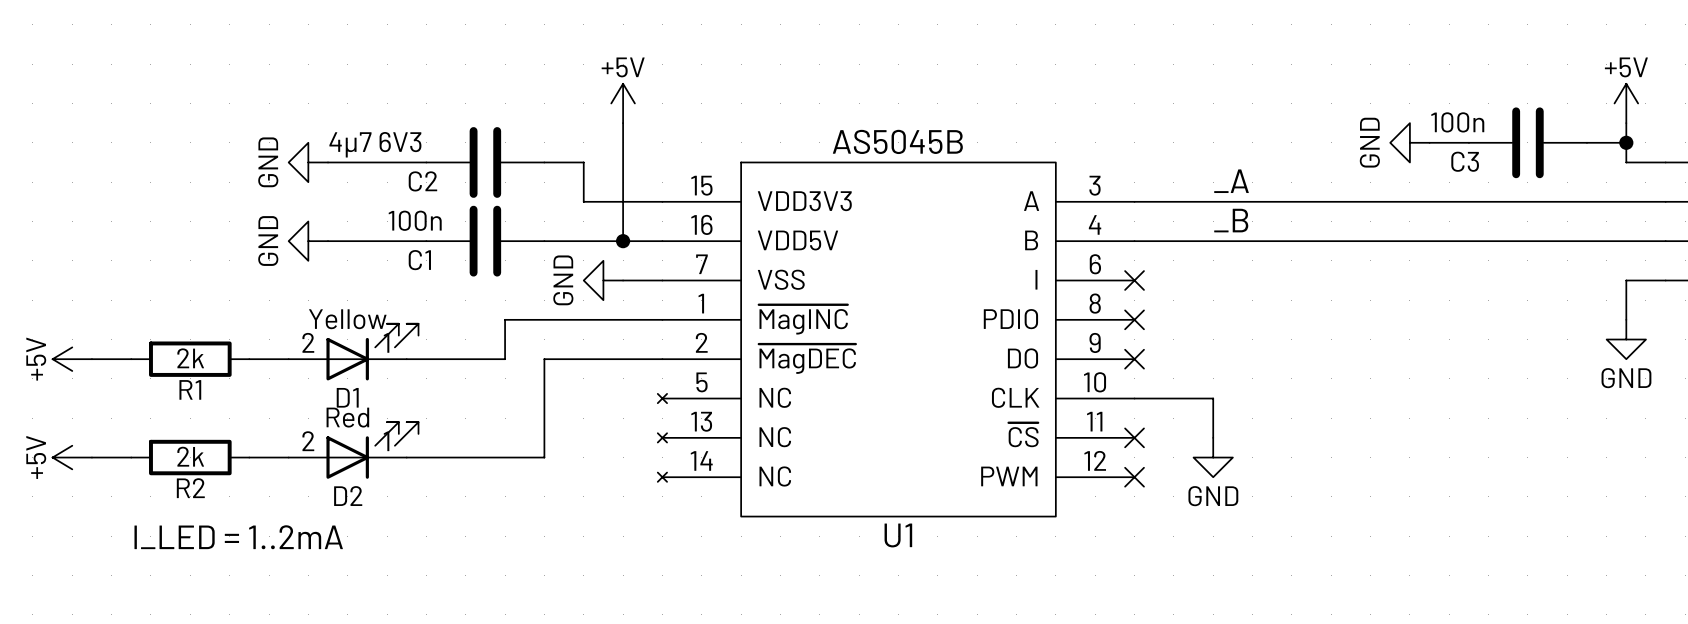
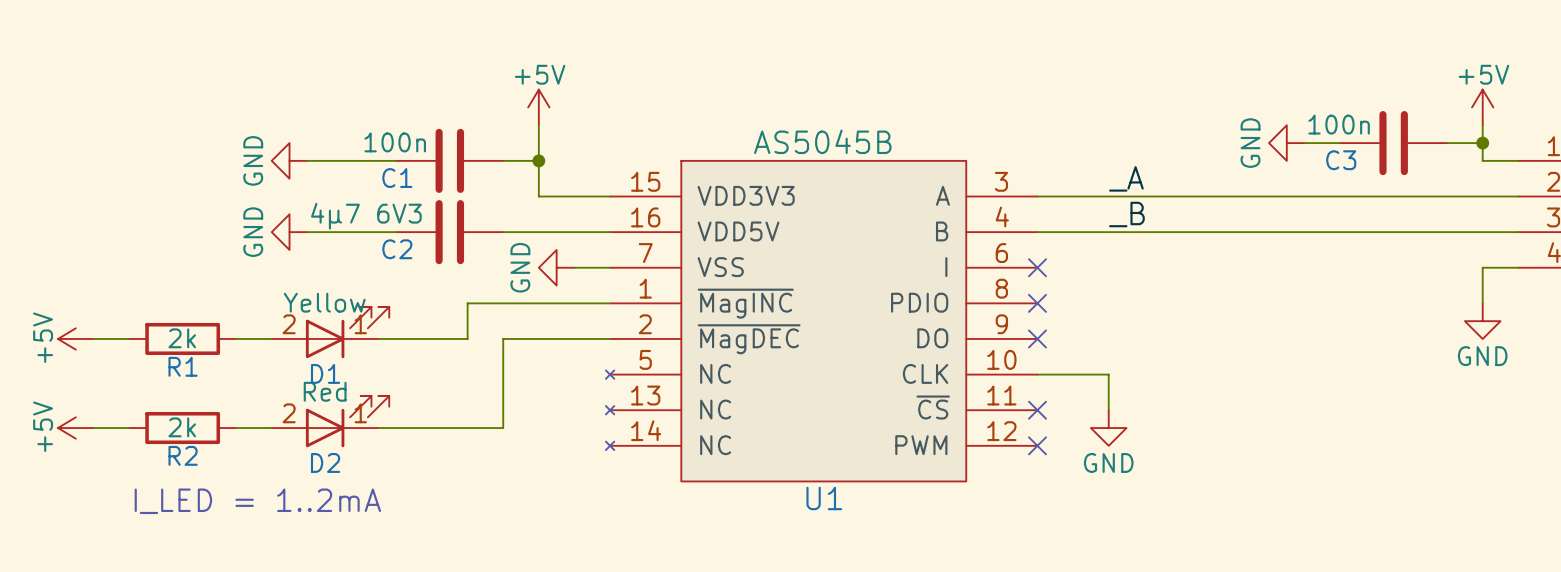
power symbol position: +5V (623, 103) -> +5V (538, 107)
wire: none -> (538, 125) (538, 160)
wire: (623, 123) (623, 241) -> none
C2 value: 4µ7 6V3 (375, 144) -> 100n (395, 142)
C2 name: C2 (422, 181) -> C1 (397, 178)
C1 value: 100n (415, 220) -> 4µ7 6V3 (366, 216)
junction position: (623, 241) -> (538, 160)
C1 name: C1 (419, 260) -> C2 (397, 249)

